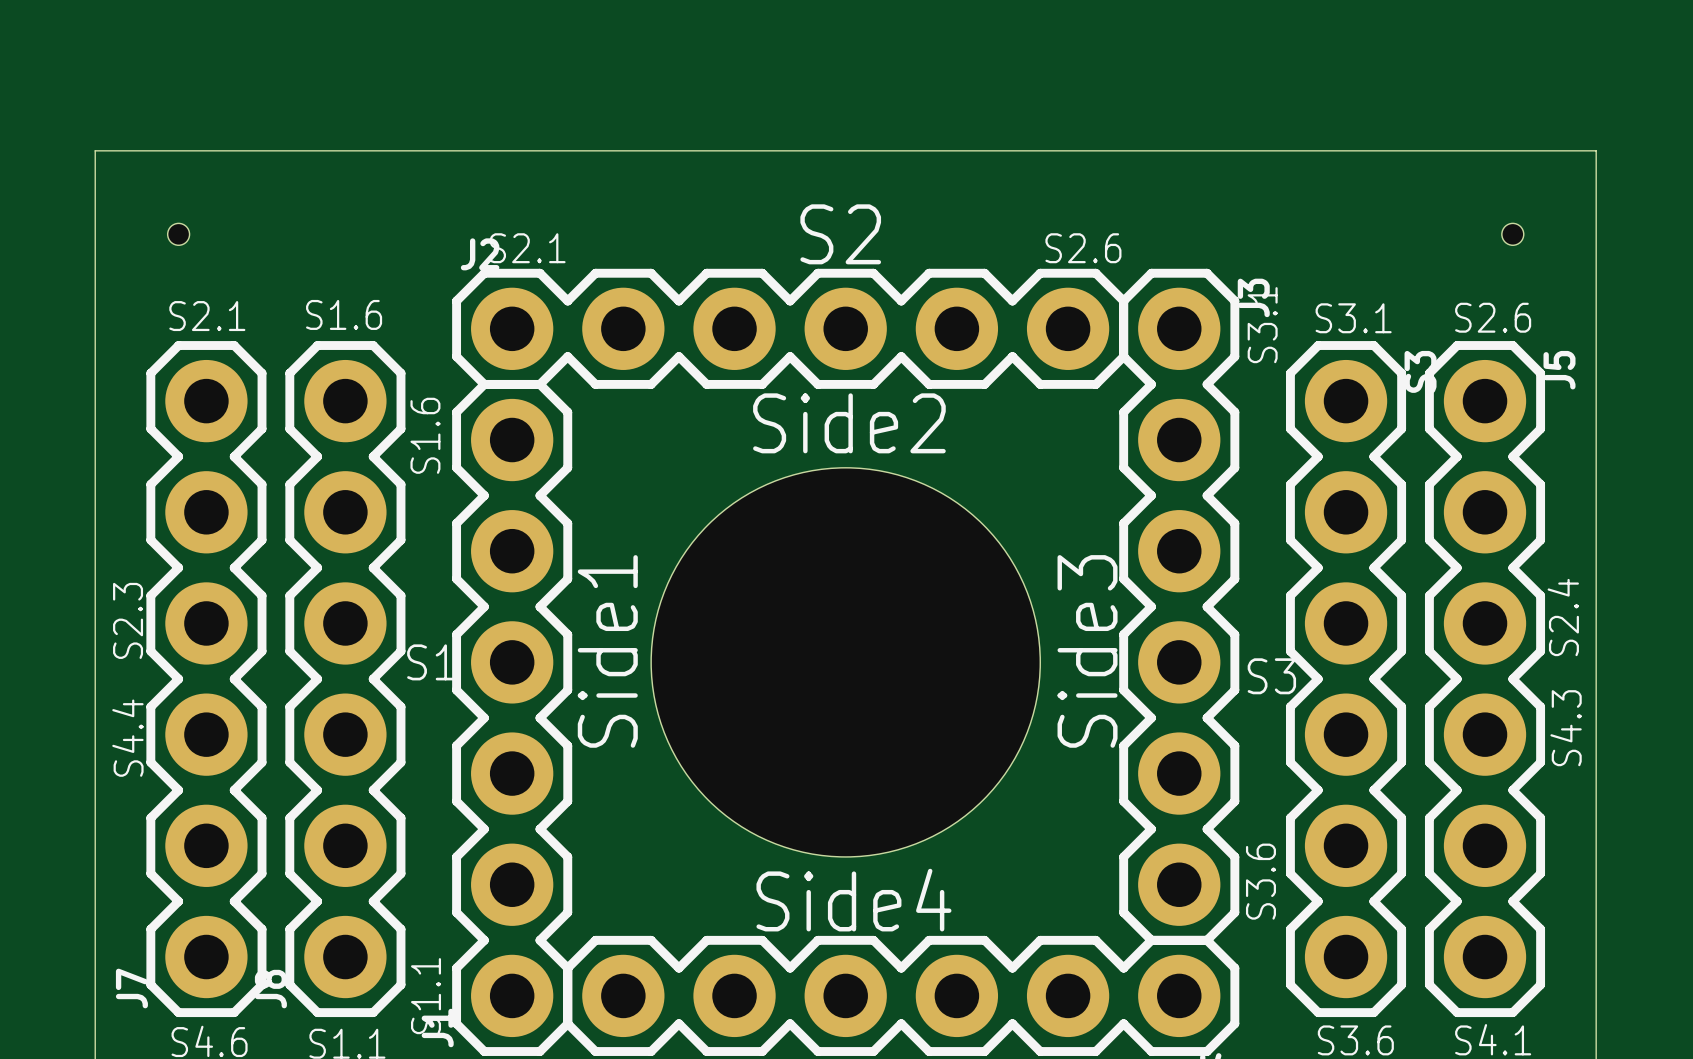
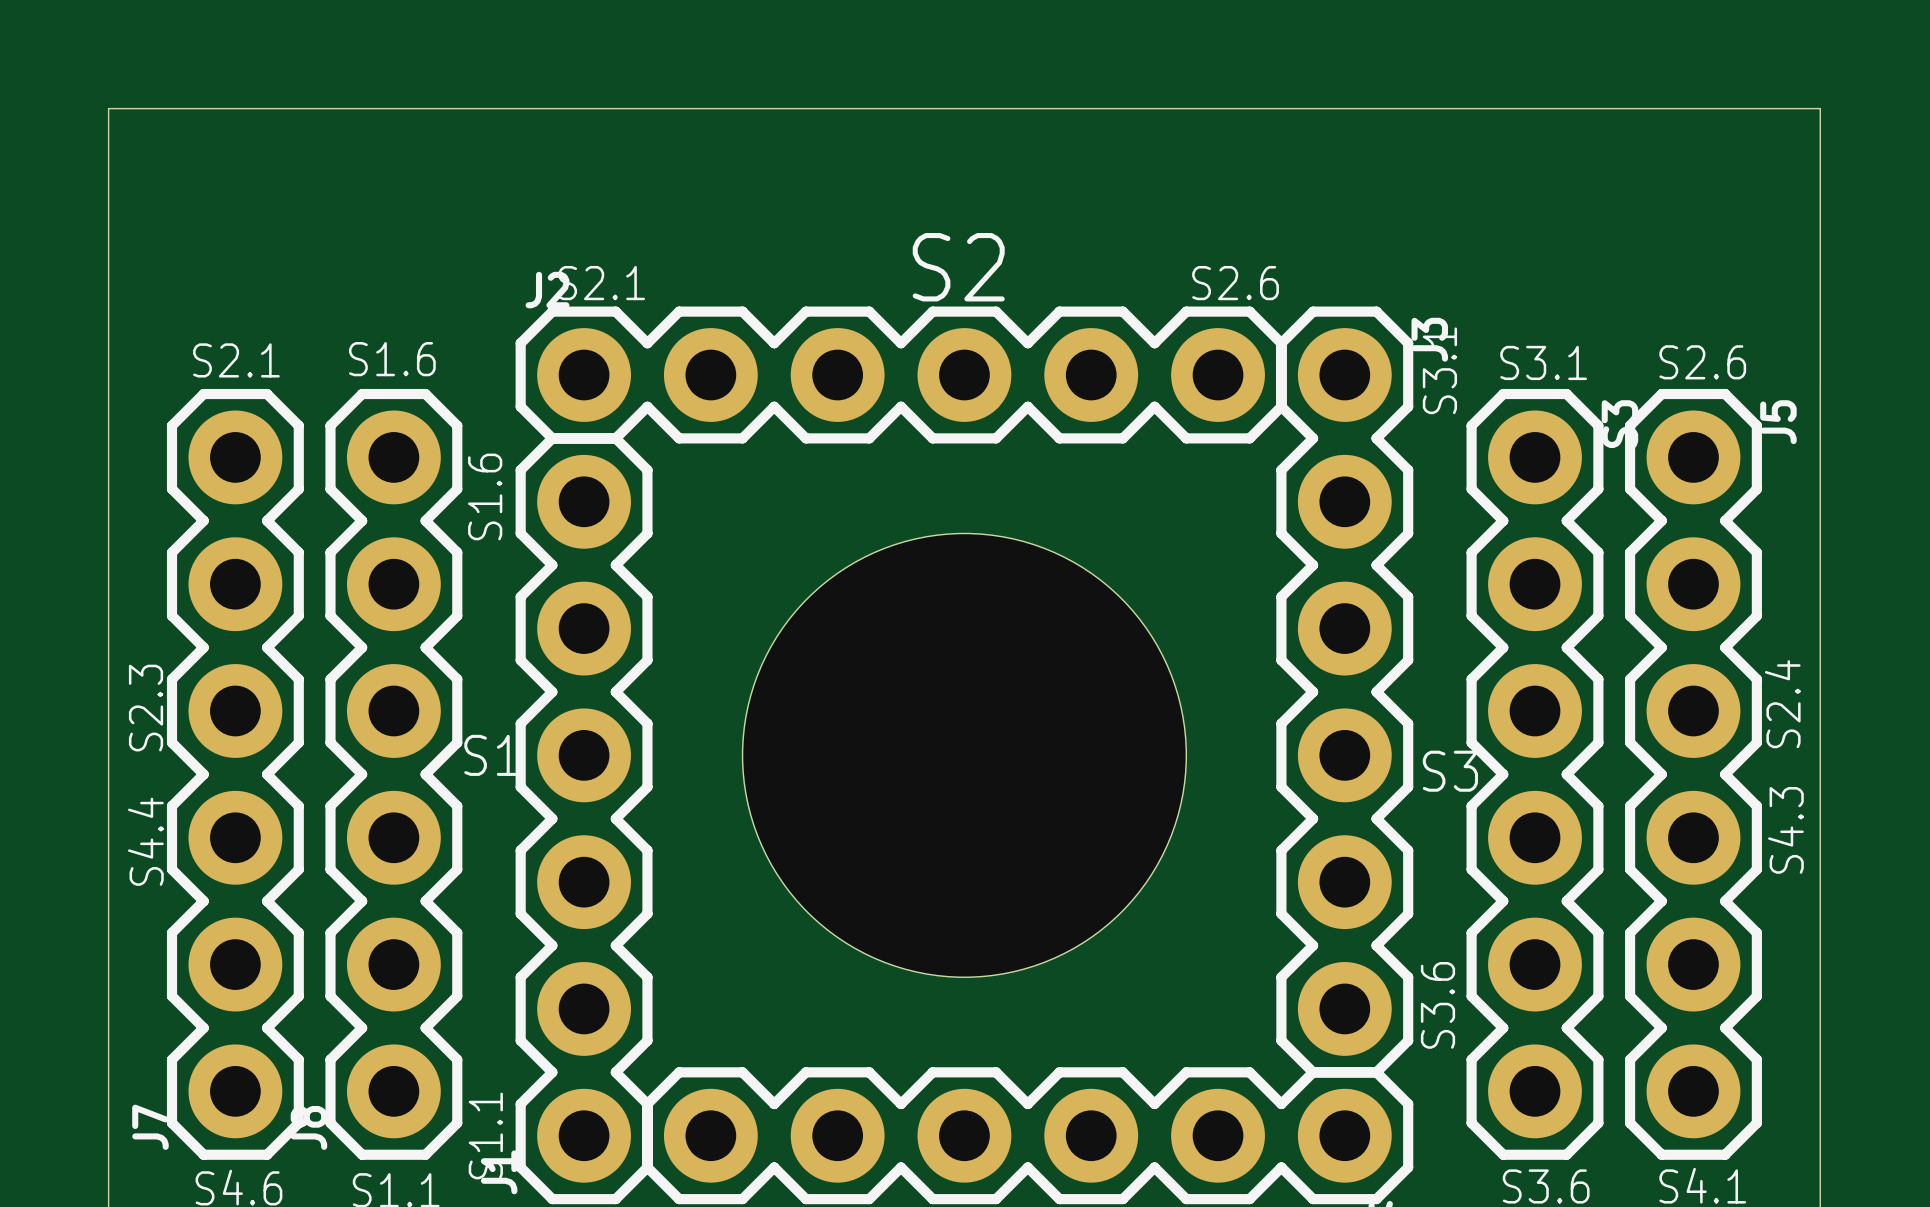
board edge: (95, 150) (1596, 150) -> (108, 172) (108, 108) (1820, 108) (1820, 172)
hole: (178, 234) -> none
hole: (1512, 234) -> none
text: Side2 (849, 423) -> none
text: Side1 (607, 651) -> none
text: Side3 (1087, 651) -> none
text: Side4 (853, 900) -> none

